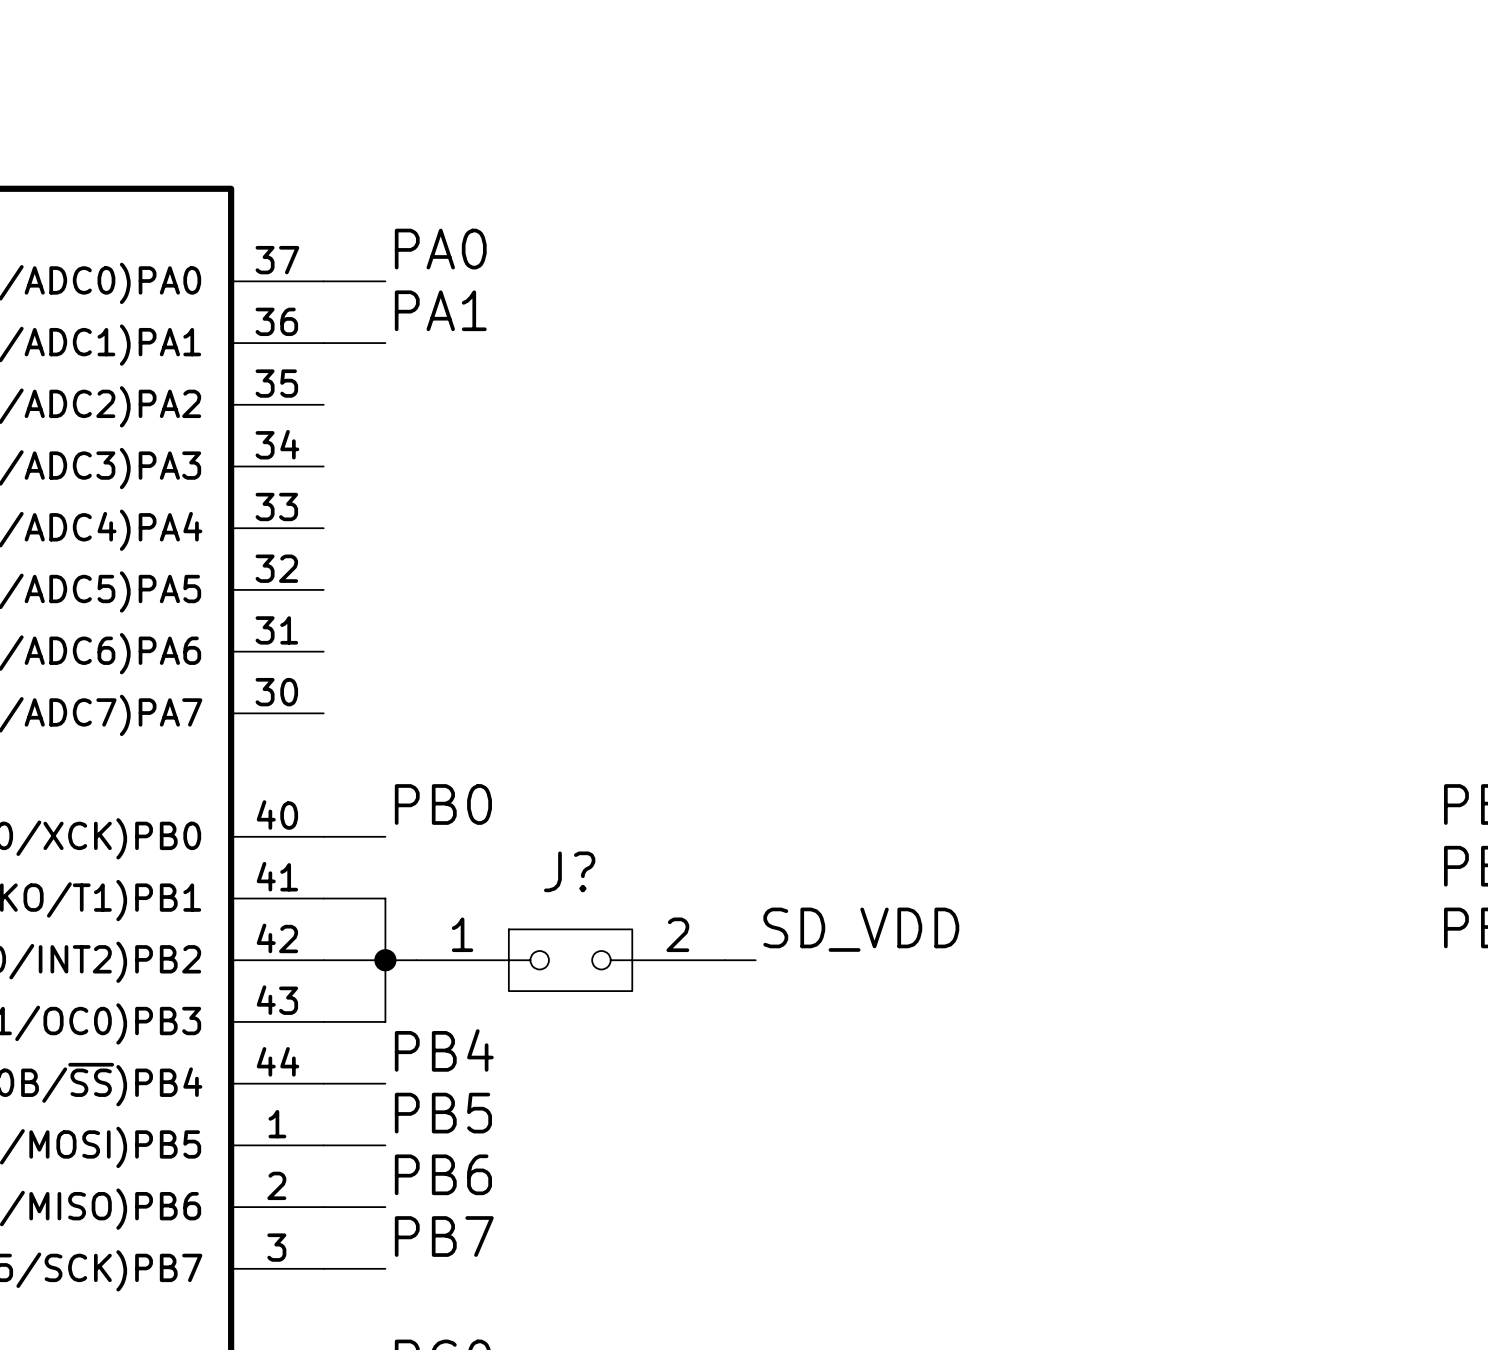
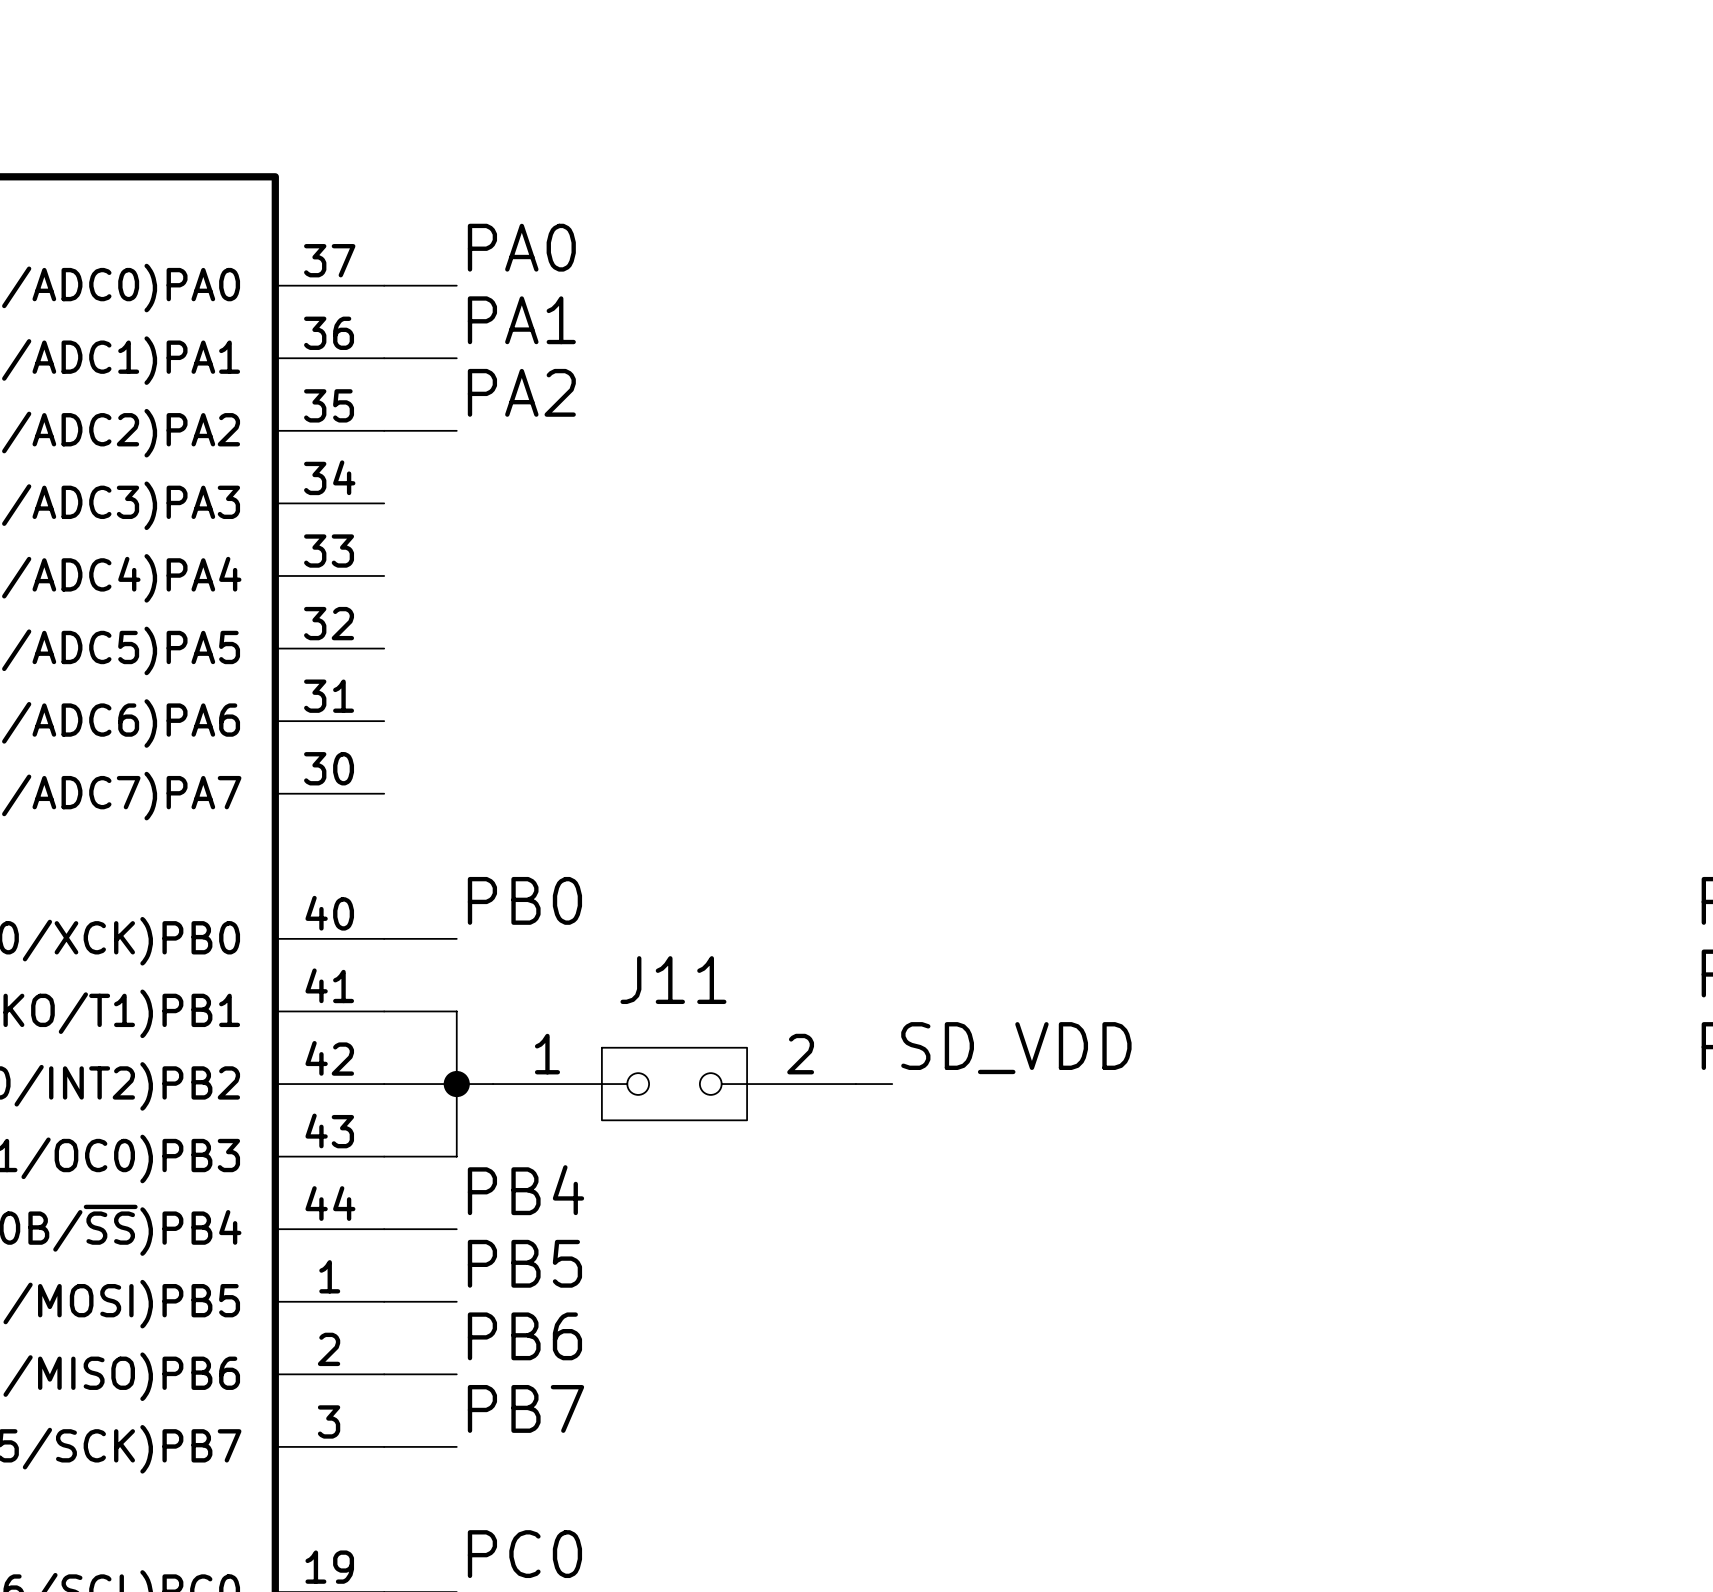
label: none -> PA2 (521, 392)
wire: none -> (384, 430) (456, 430)
J? name: J? (569, 871) -> J11 (673, 980)

